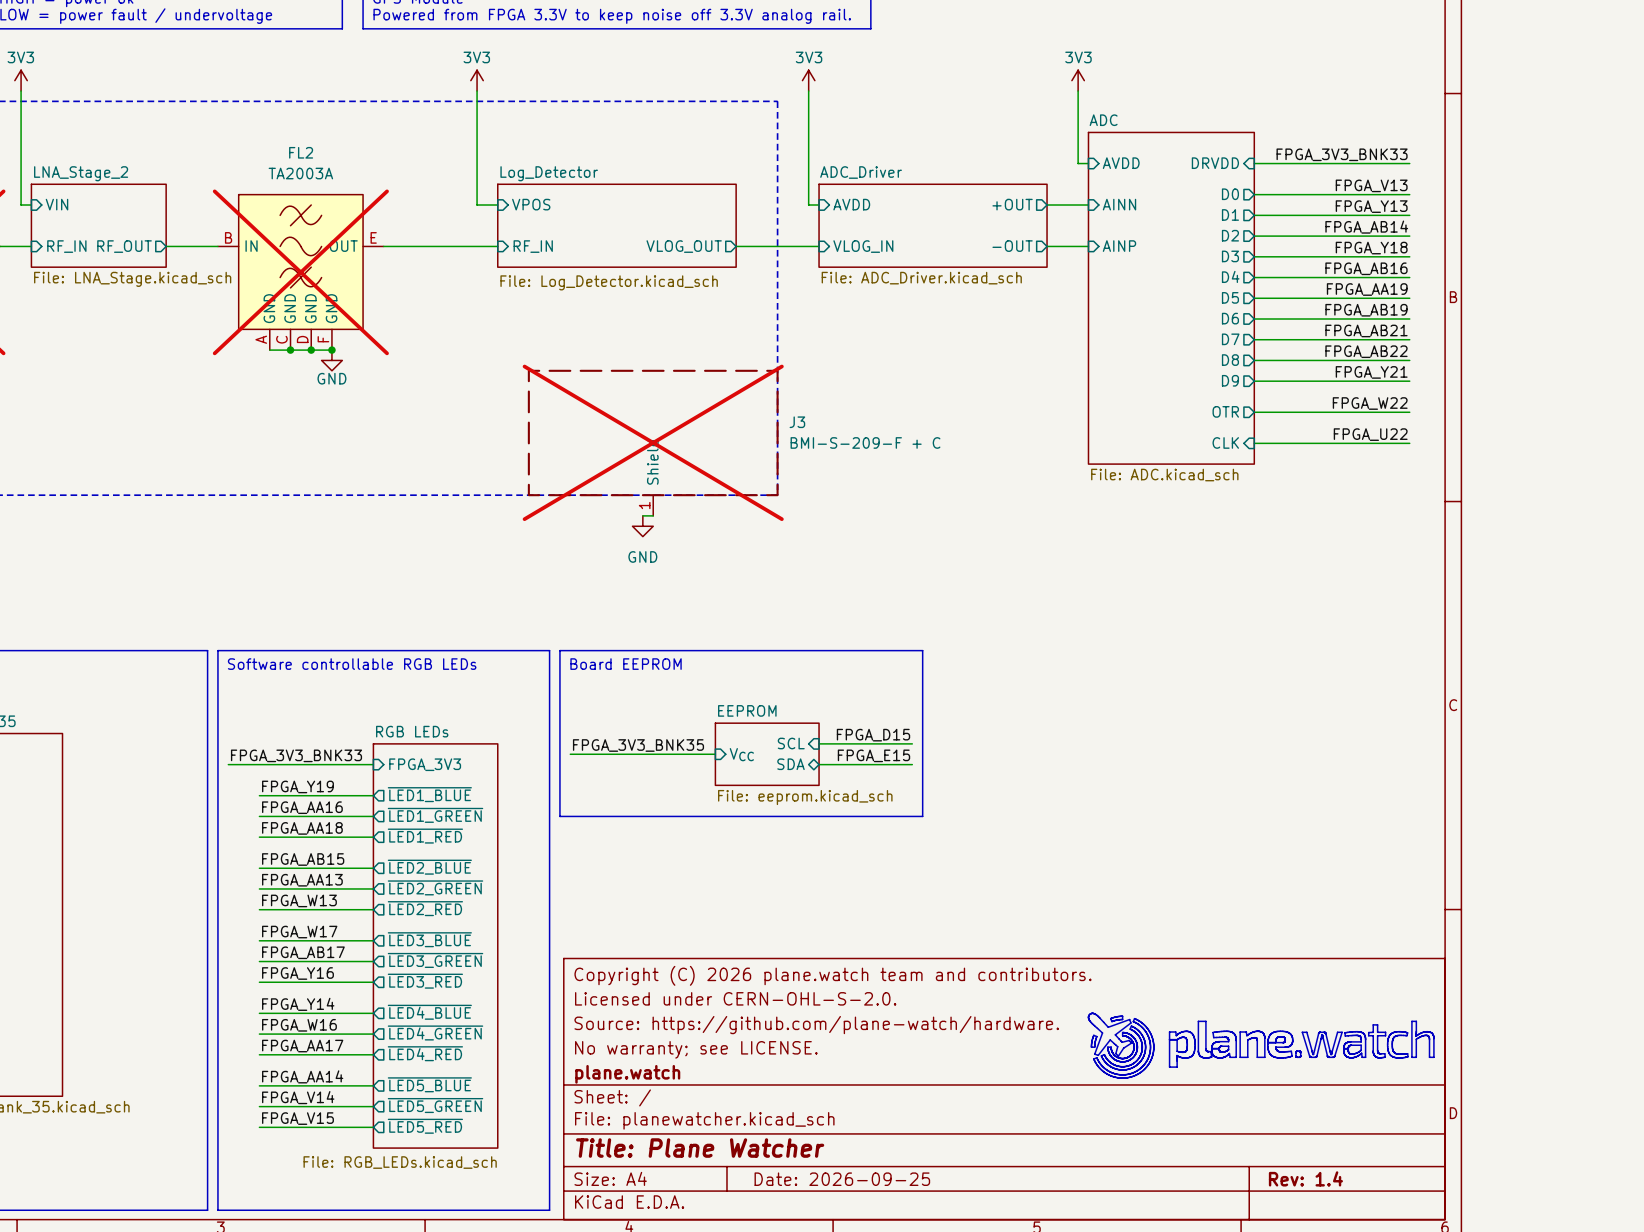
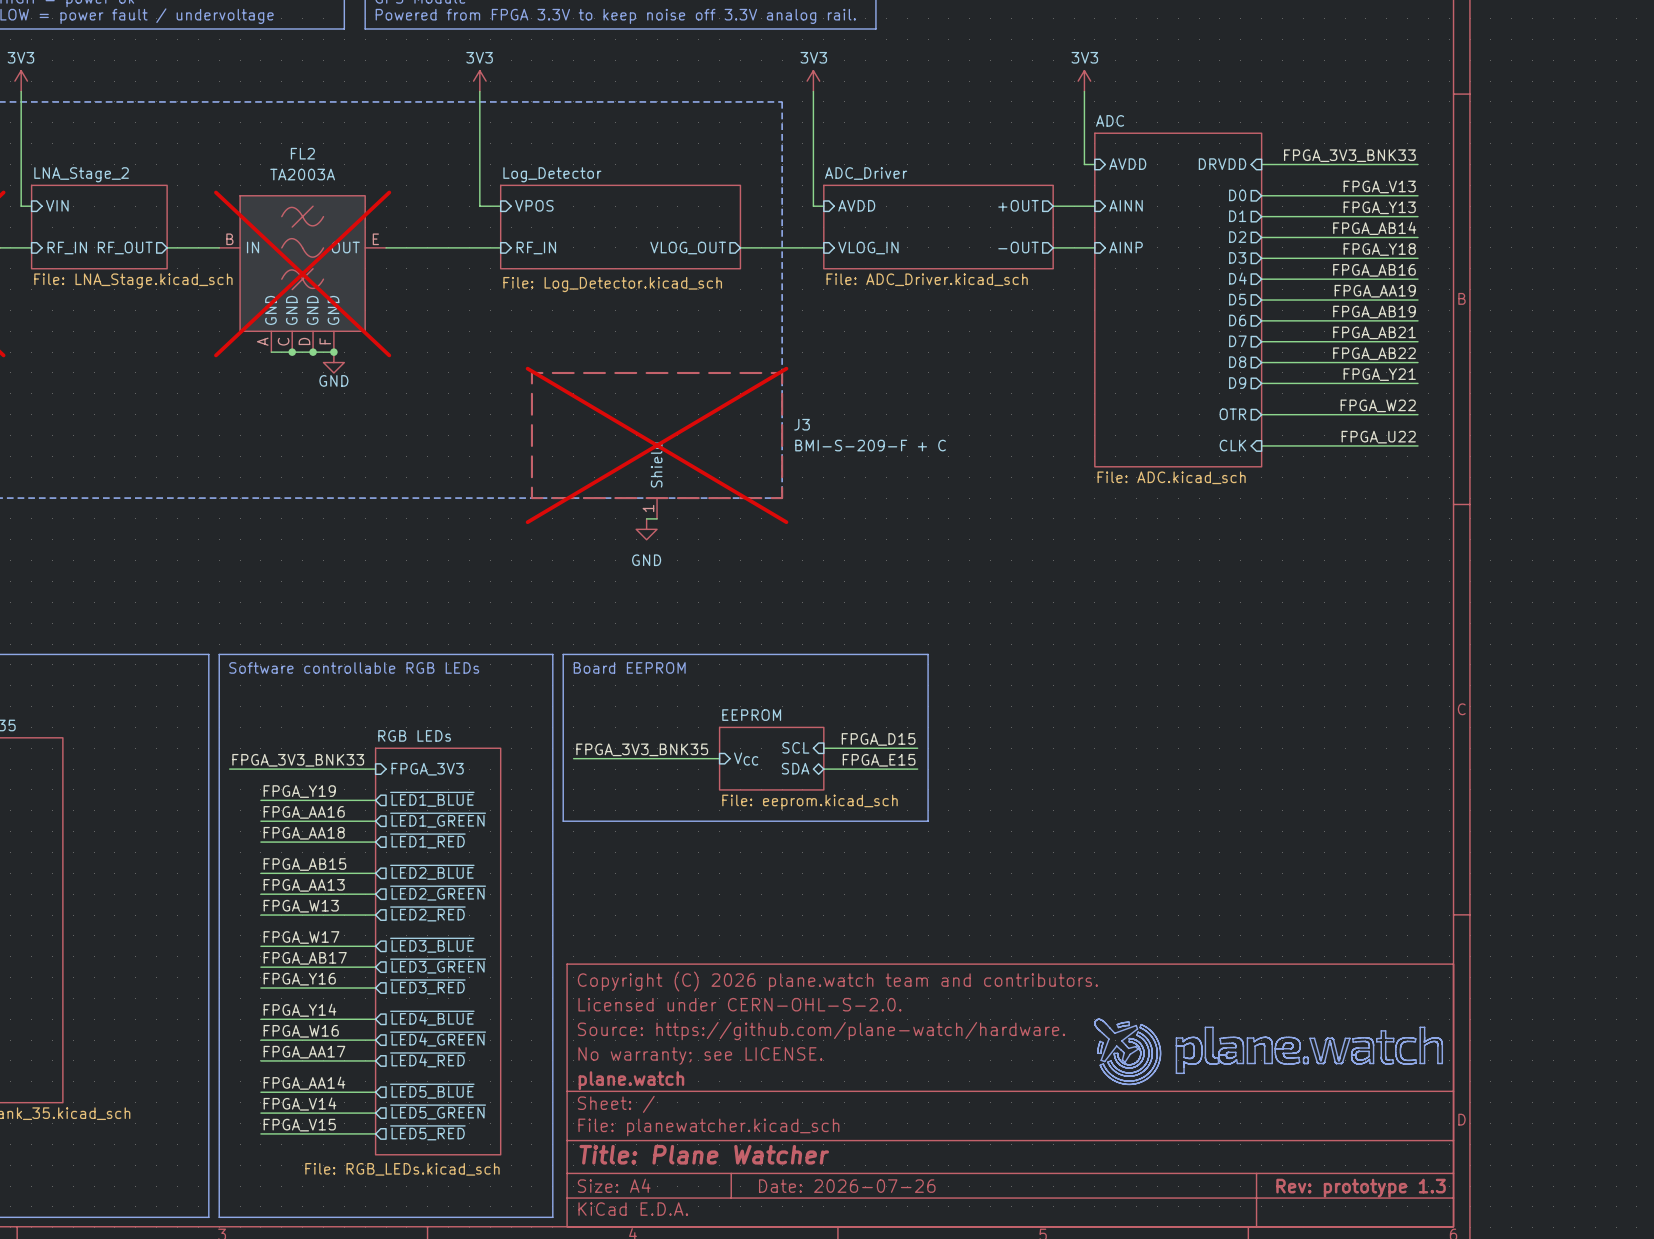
title block: Rev: 1.4 (1305, 1178) -> Rev: prototype 1.3 (1361, 1188)
title block: Date: 2026-09-25 (842, 1179) -> Date: 2026-07-26 (847, 1186)

